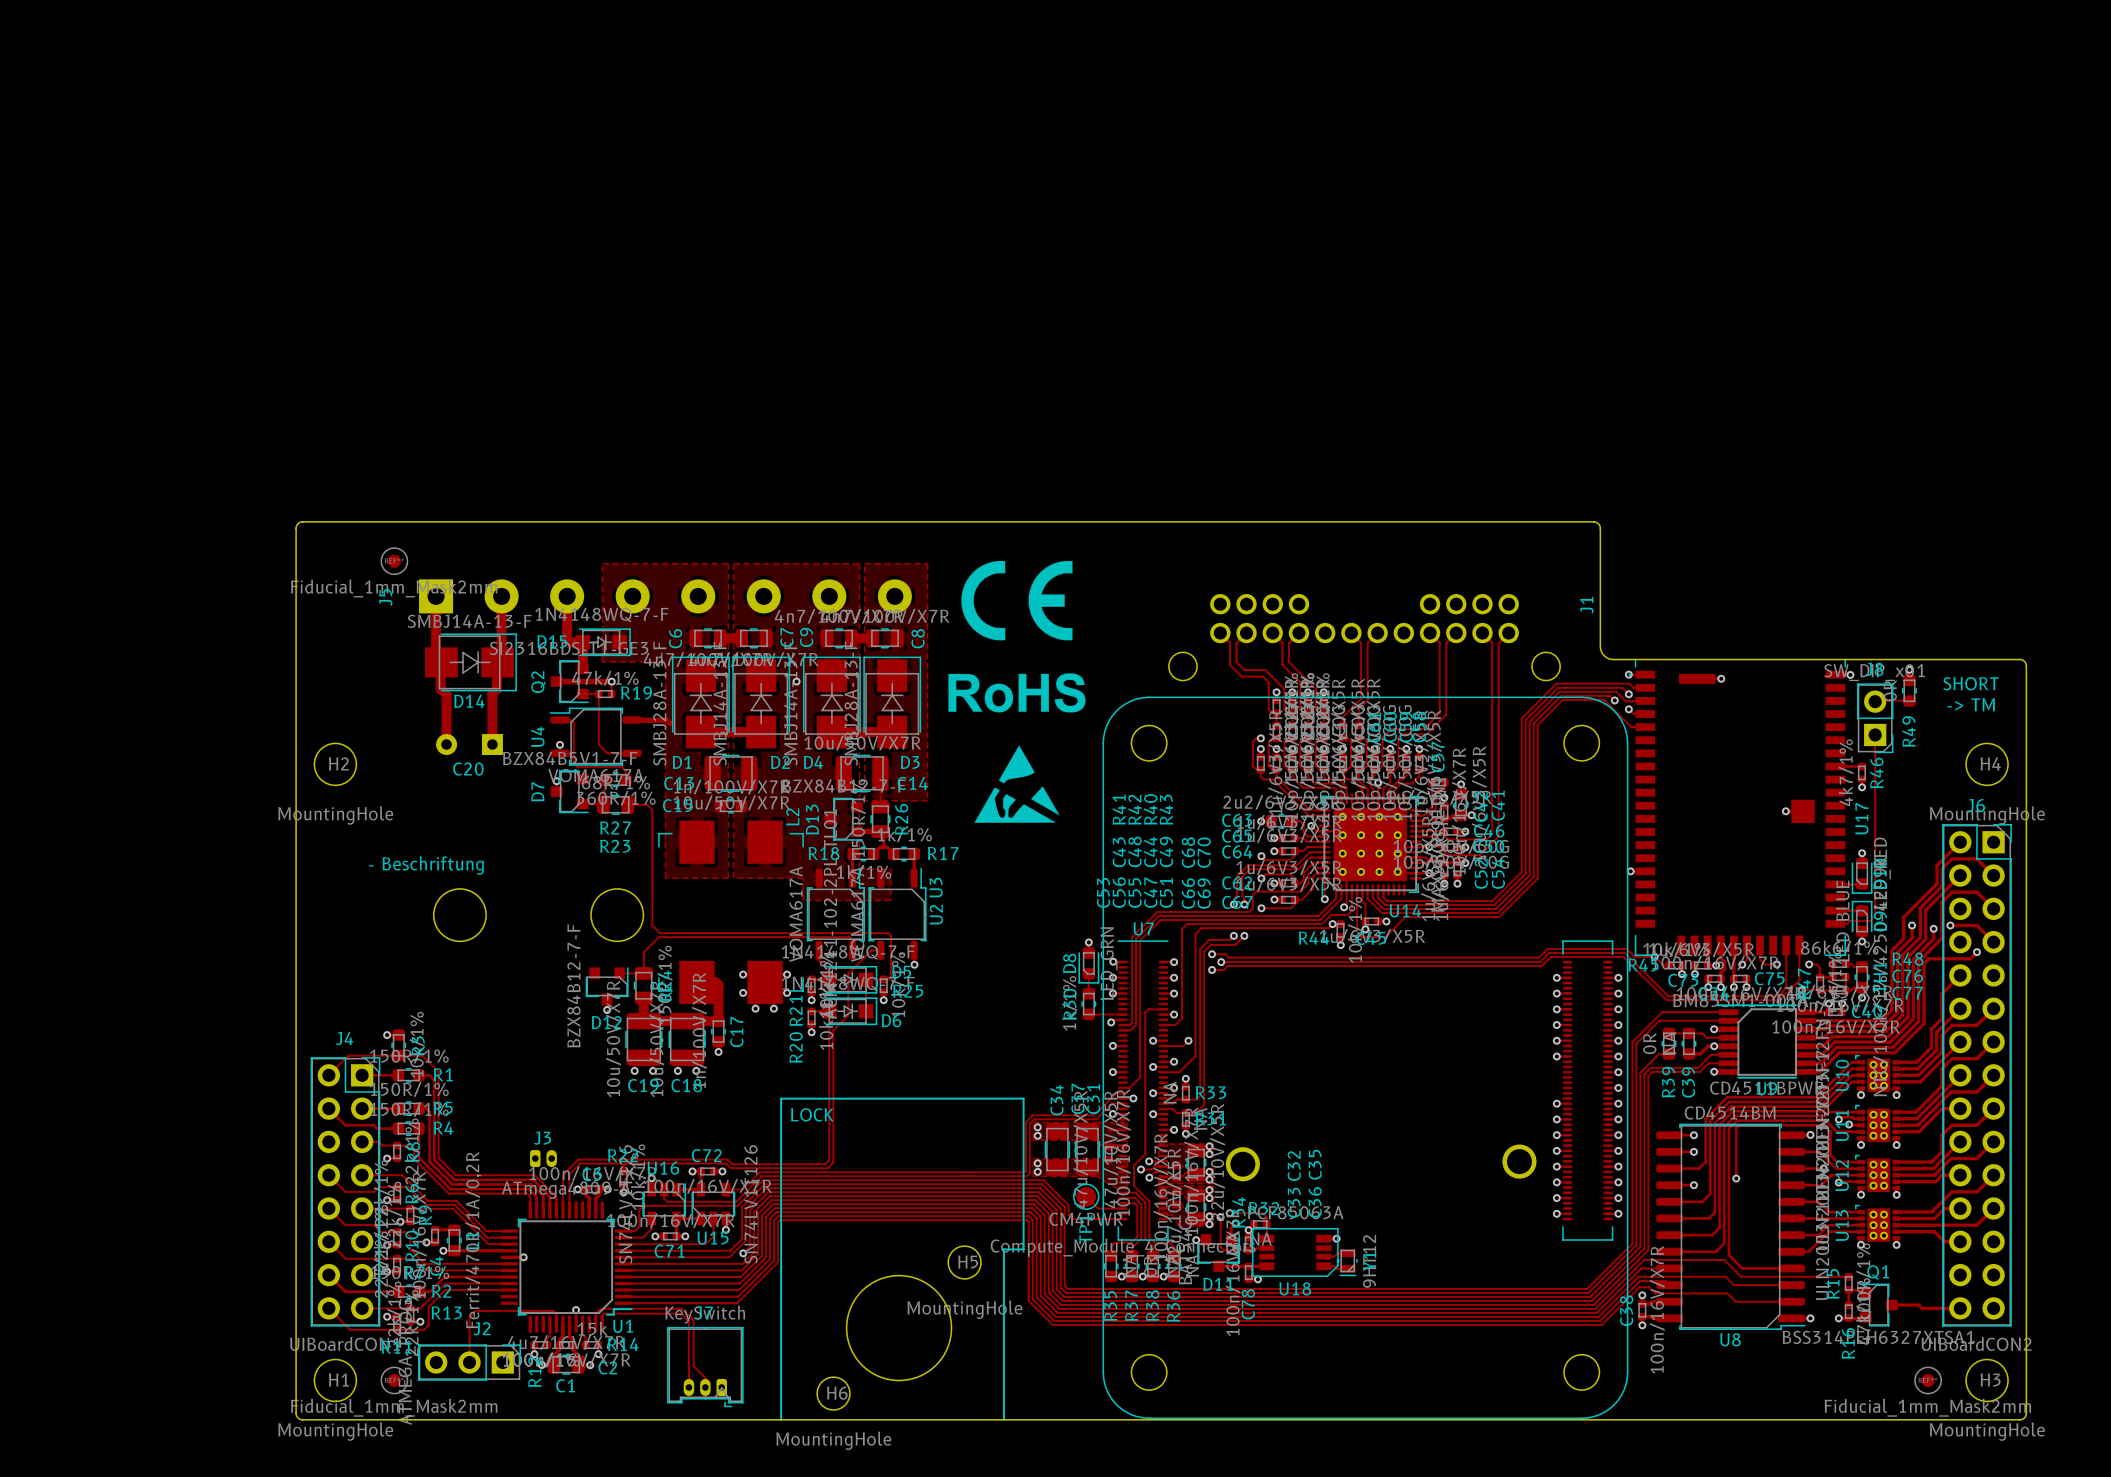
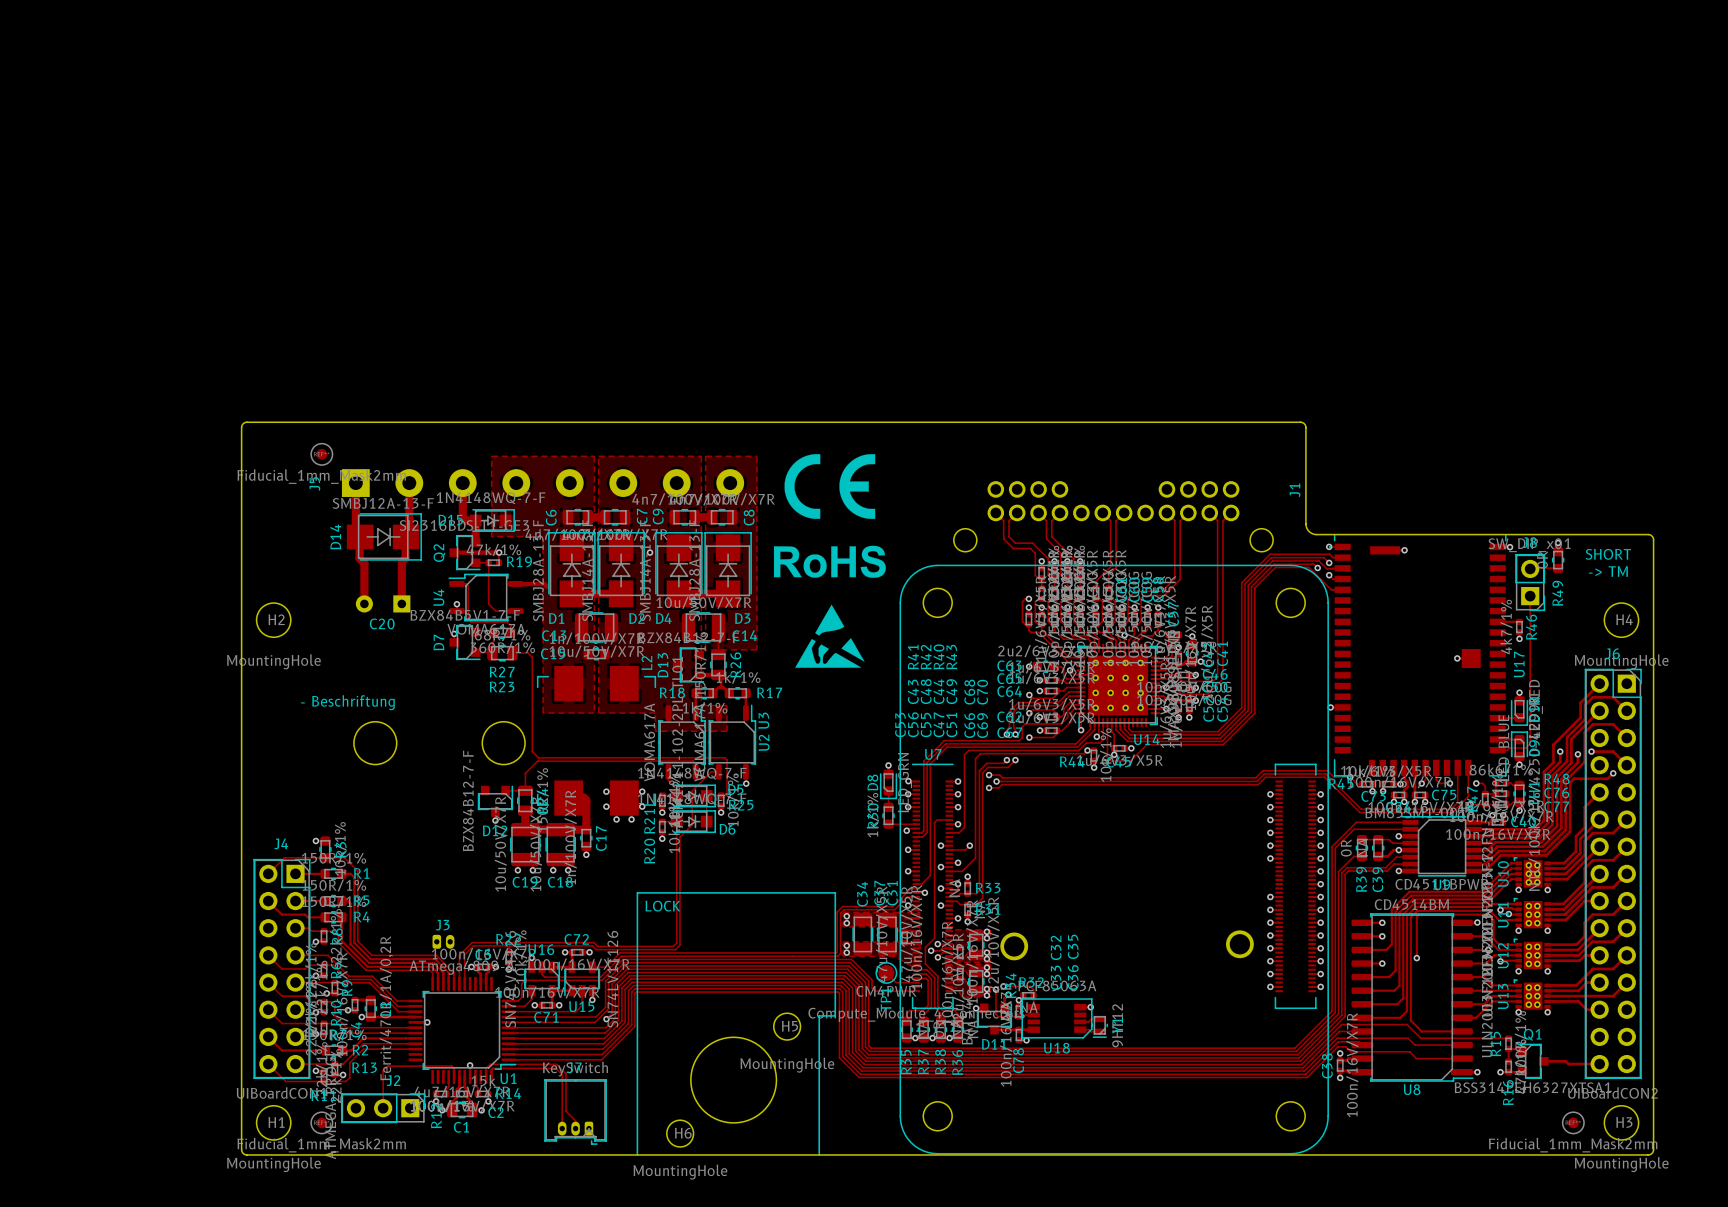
D14 value: SMBJ14A-13-F (469, 621) -> SMBJ12A-13-F (383, 503)
D14 name rotation: 0° (469, 701) -> 90° counterclockwise (335, 537)
D14 name position: D14 (469, 701) -> D14 (335, 537)

